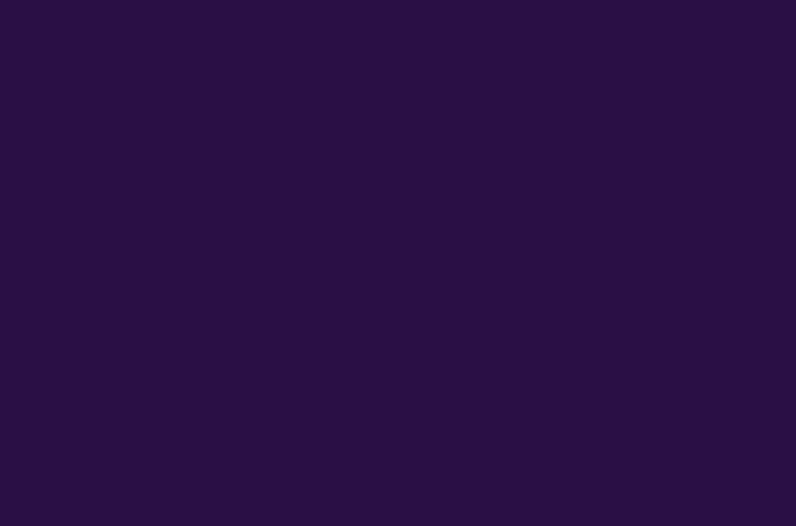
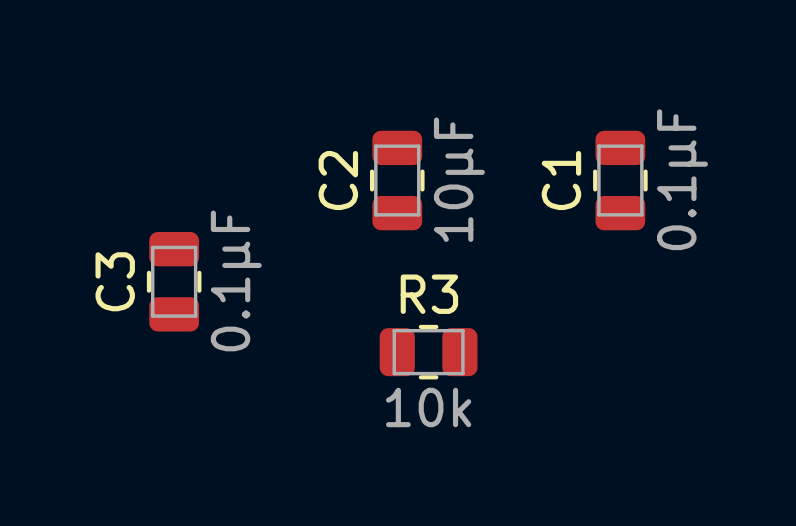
C2: none -> 10µF (397, 180)
C1: none -> 0.1µF (620, 180)
C3: none -> 0.1µF (174, 281)
R3: none -> 10k (428, 352)

